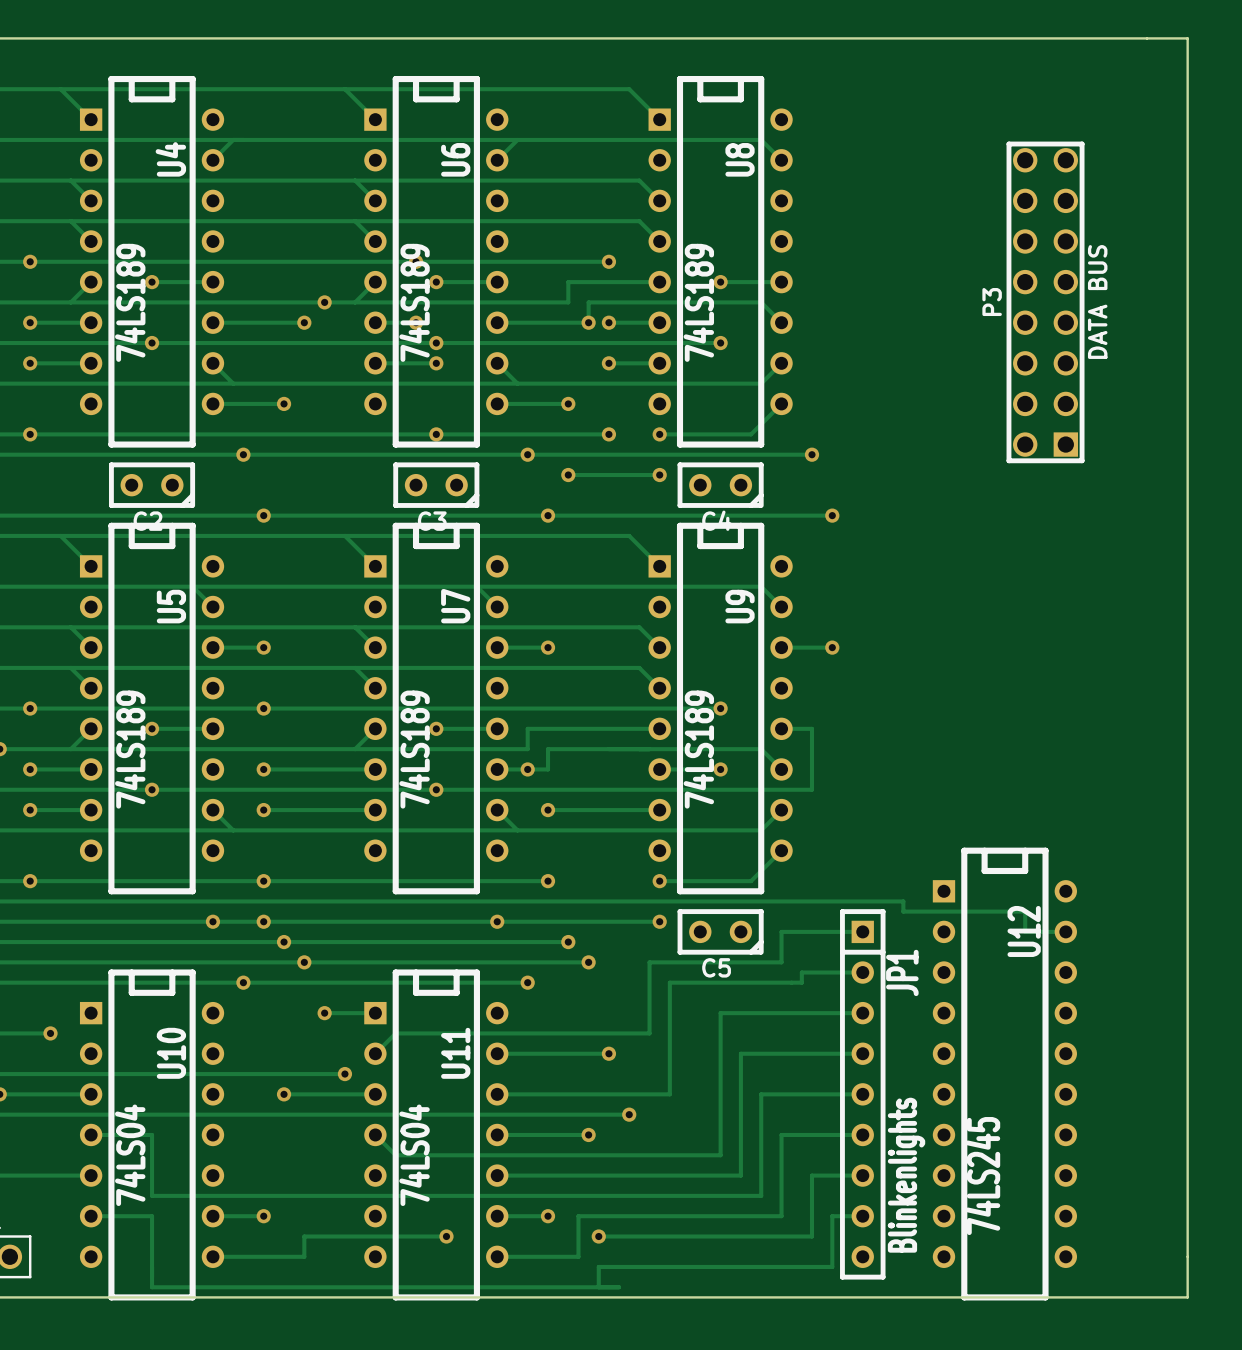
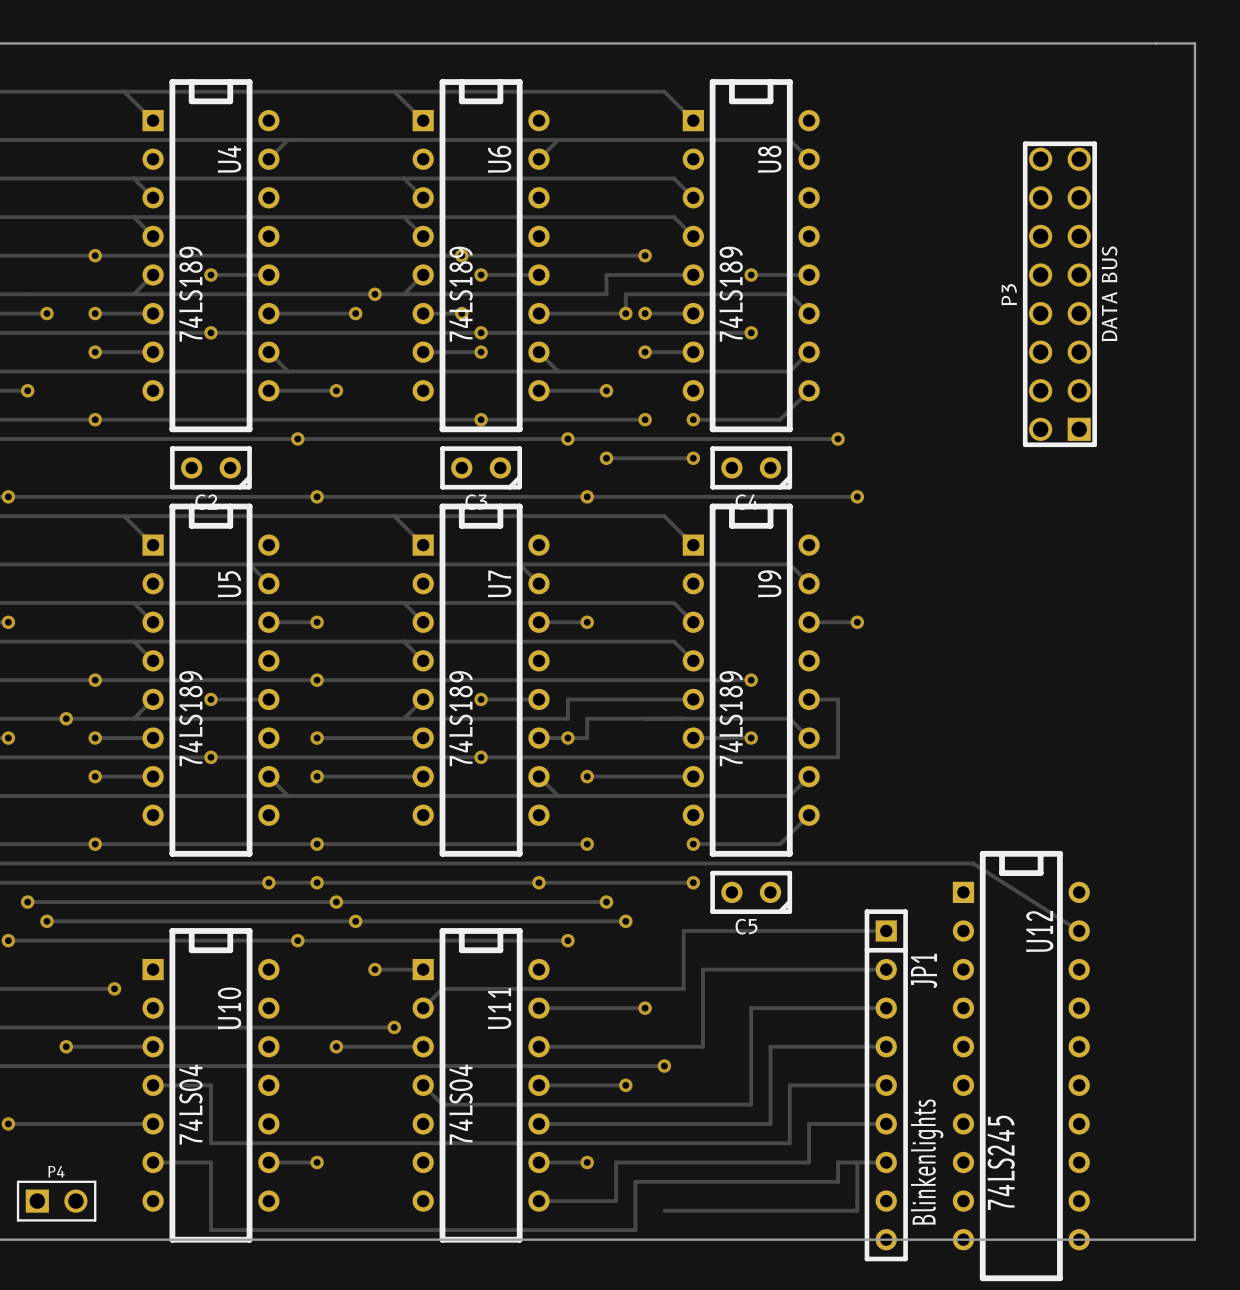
track: (903, 901) (903, 911) (1025, 911) (1025, 931) (1065, 931) -> (924, 863) (973, 863) (1079, 930)
track: (862, 931) (781, 931) (781, 962) (649, 962) (649, 972) -> none
track: (801, 972) (801, 982) (669, 982) (669, 1013) -> (828, 930) (683, 930)
track: (720, 1013) (720, 1053) -> (751, 969) (702, 969)
track: (740, 1053) (740, 1094) -> (770, 1008) (751, 1008)
U12 position: (1004, 1074) -> (1021, 1066)
track: (761, 1094) (761, 1134) -> (789, 1046) (770, 1046)
JP1 position: (862, 1094) -> (886, 1085)
track: (781, 1134) (781, 1175) -> (809, 1085) (789, 1085)
track: none -> (809, 1123) (838, 1123)
track: (811, 1175) (811, 1216) -> (857, 1162) (838, 1162)
track: (446, 1236) (304, 1236) (304, 1256) (212, 1256) -> none
via: (446, 1236) -> none
via: (598, 1236) -> none
track: (598, 1266) (629, 1266) -> (635, 1210) (635, 1181)
track: (598, 1287) (619, 1287) -> none

